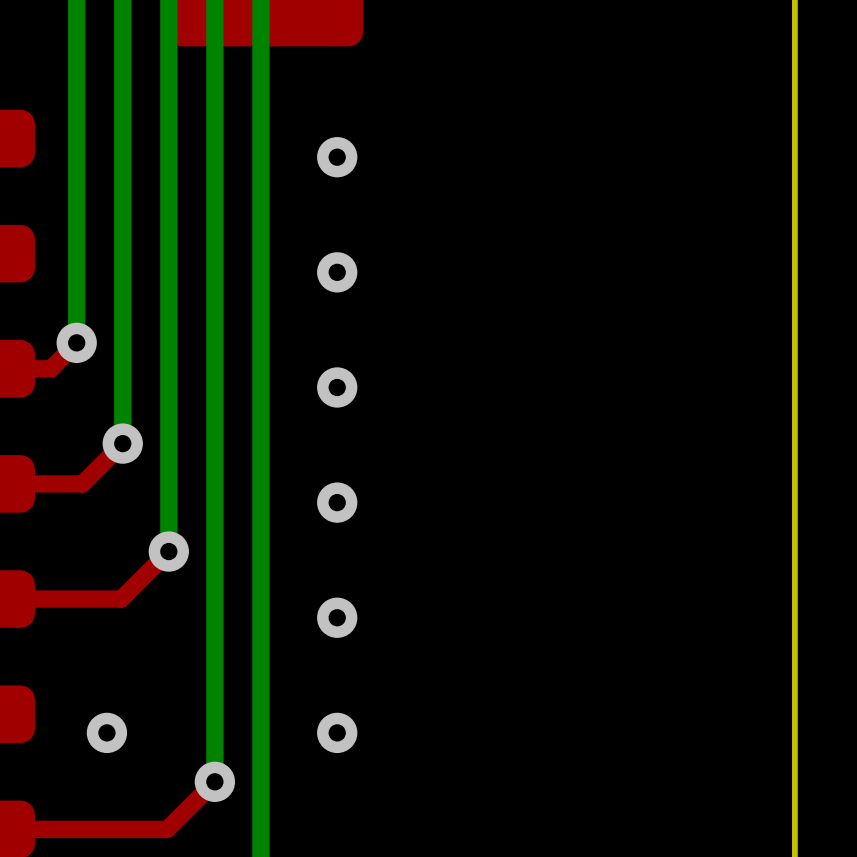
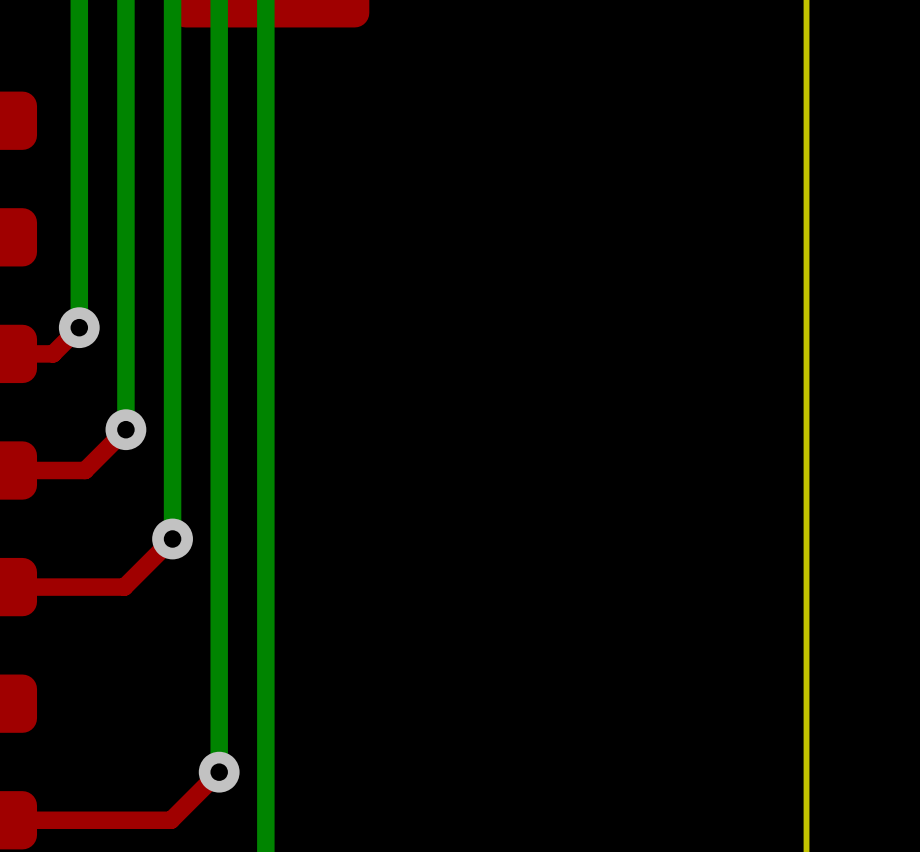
via: (337, 157) -> none
via: (337, 272) -> none
via: (337, 387) -> none
via: (337, 502) -> none
via: (337, 617) -> none
via: (106, 732) -> none
via: (337, 732) -> none

